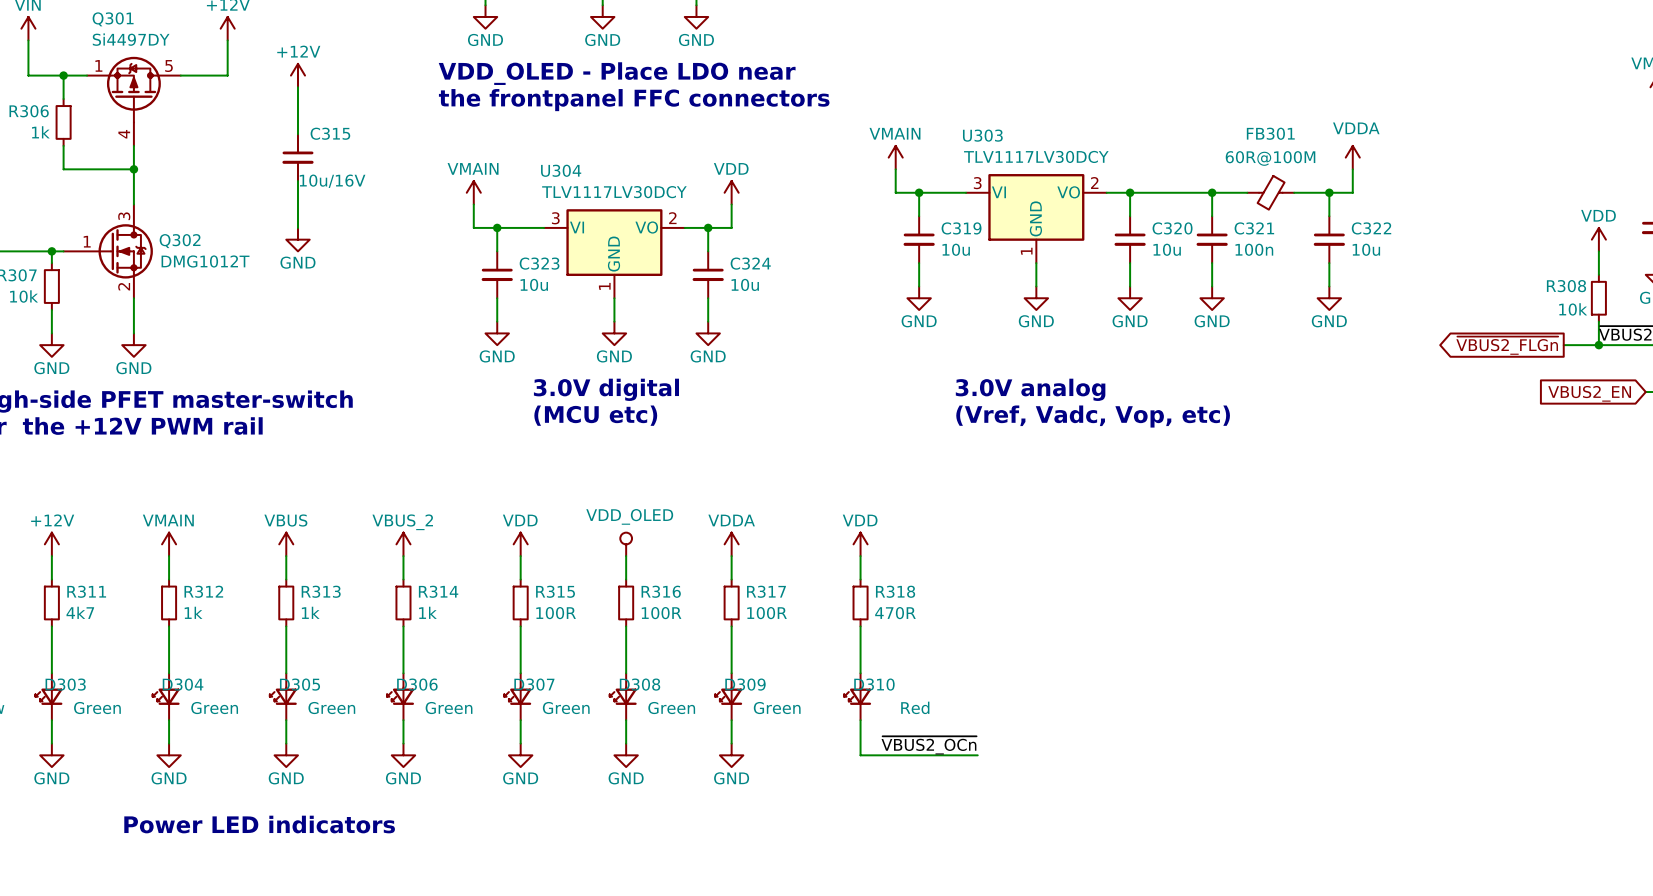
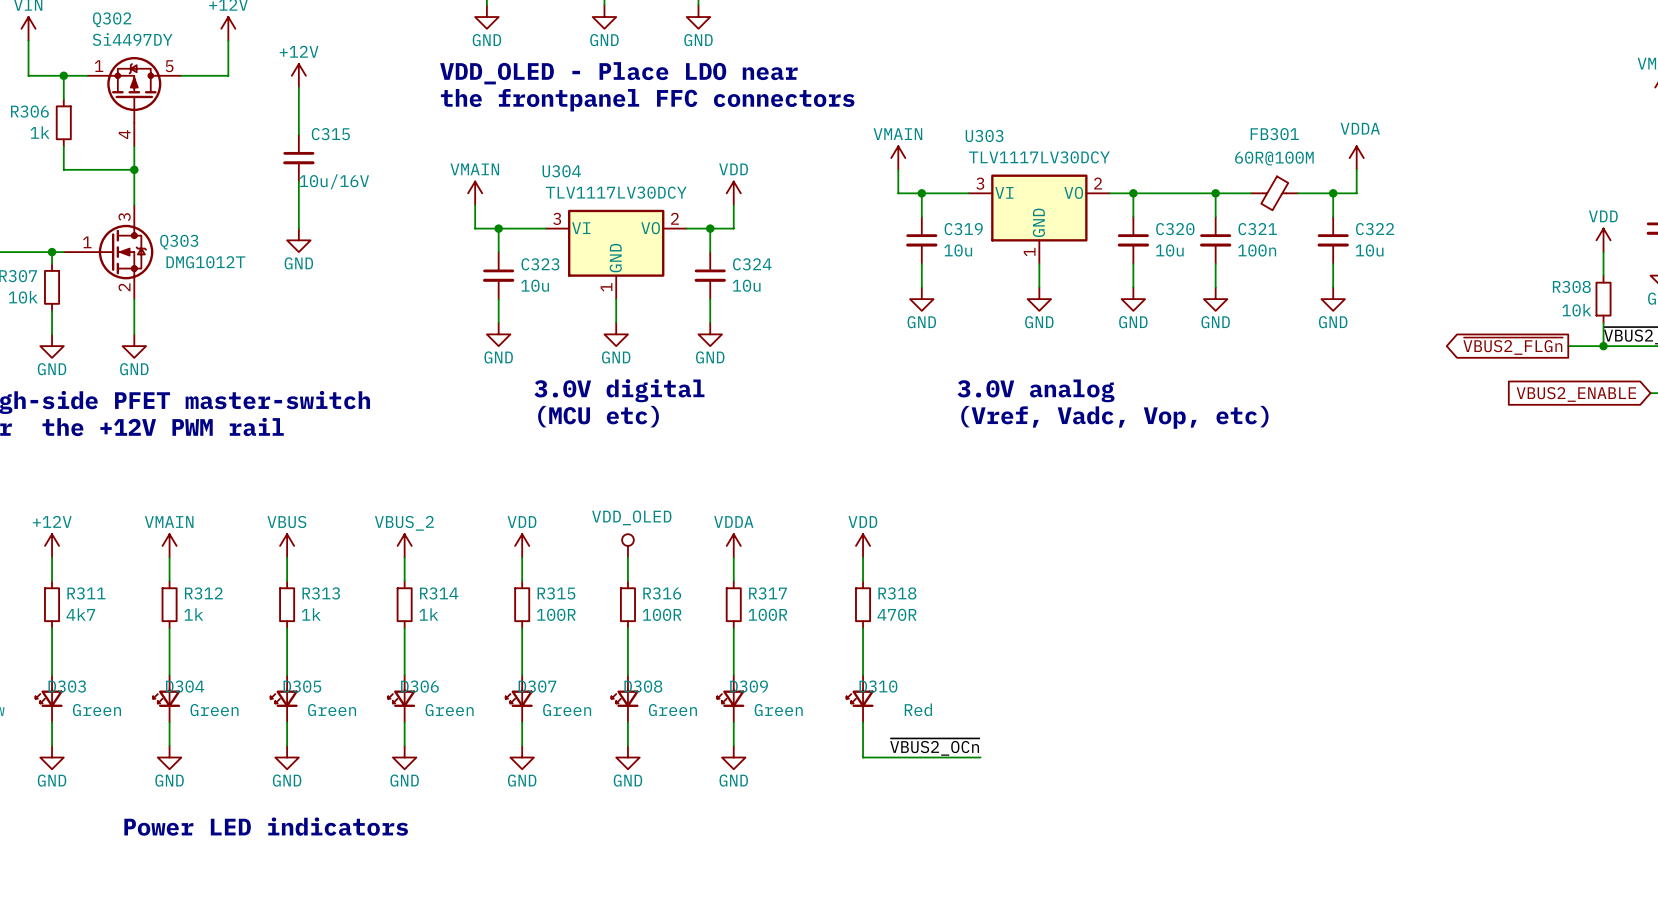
Q301 name: Q301 (113, 19) -> Q302 (112, 19)
Q302 name: Q302 (180, 241) -> Q303 (179, 242)
global label: VBUS2_EN (1589, 393) -> VBUS2_ENABLE (1576, 394)

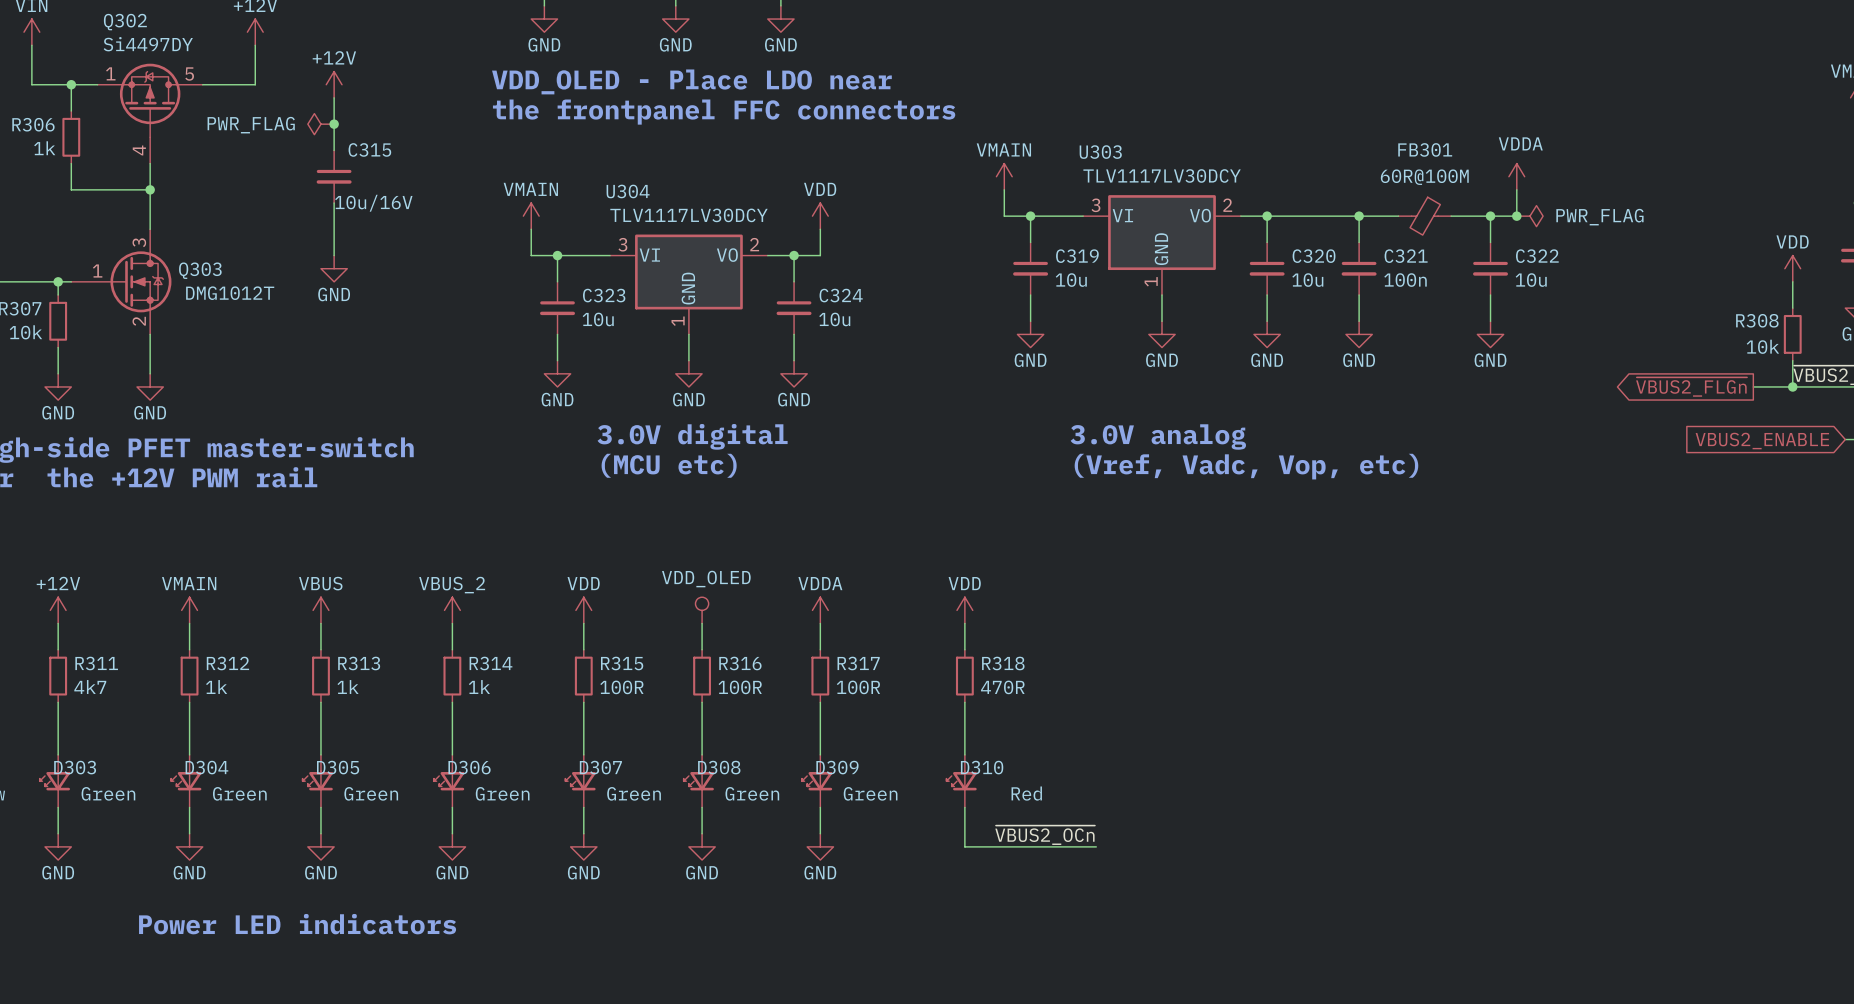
power symbol: none -> PWR_FLAG (320, 124)
junction: none -> (334, 124)
junction: none -> (1516, 216)
power symbol: none -> PWR_FLAG (1529, 216)

